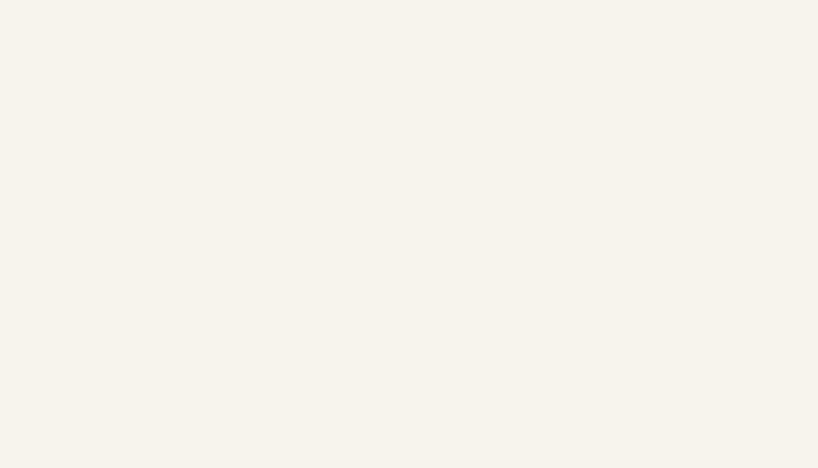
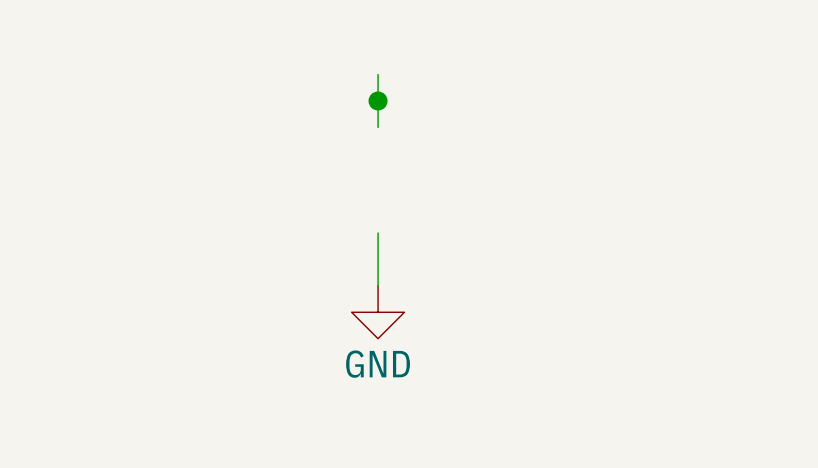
wire: none -> (378, 74) (378, 127)
junction: none -> (378, 100)
wire: none -> (378, 233) (378, 285)
power symbol: none -> GND (378, 312)

